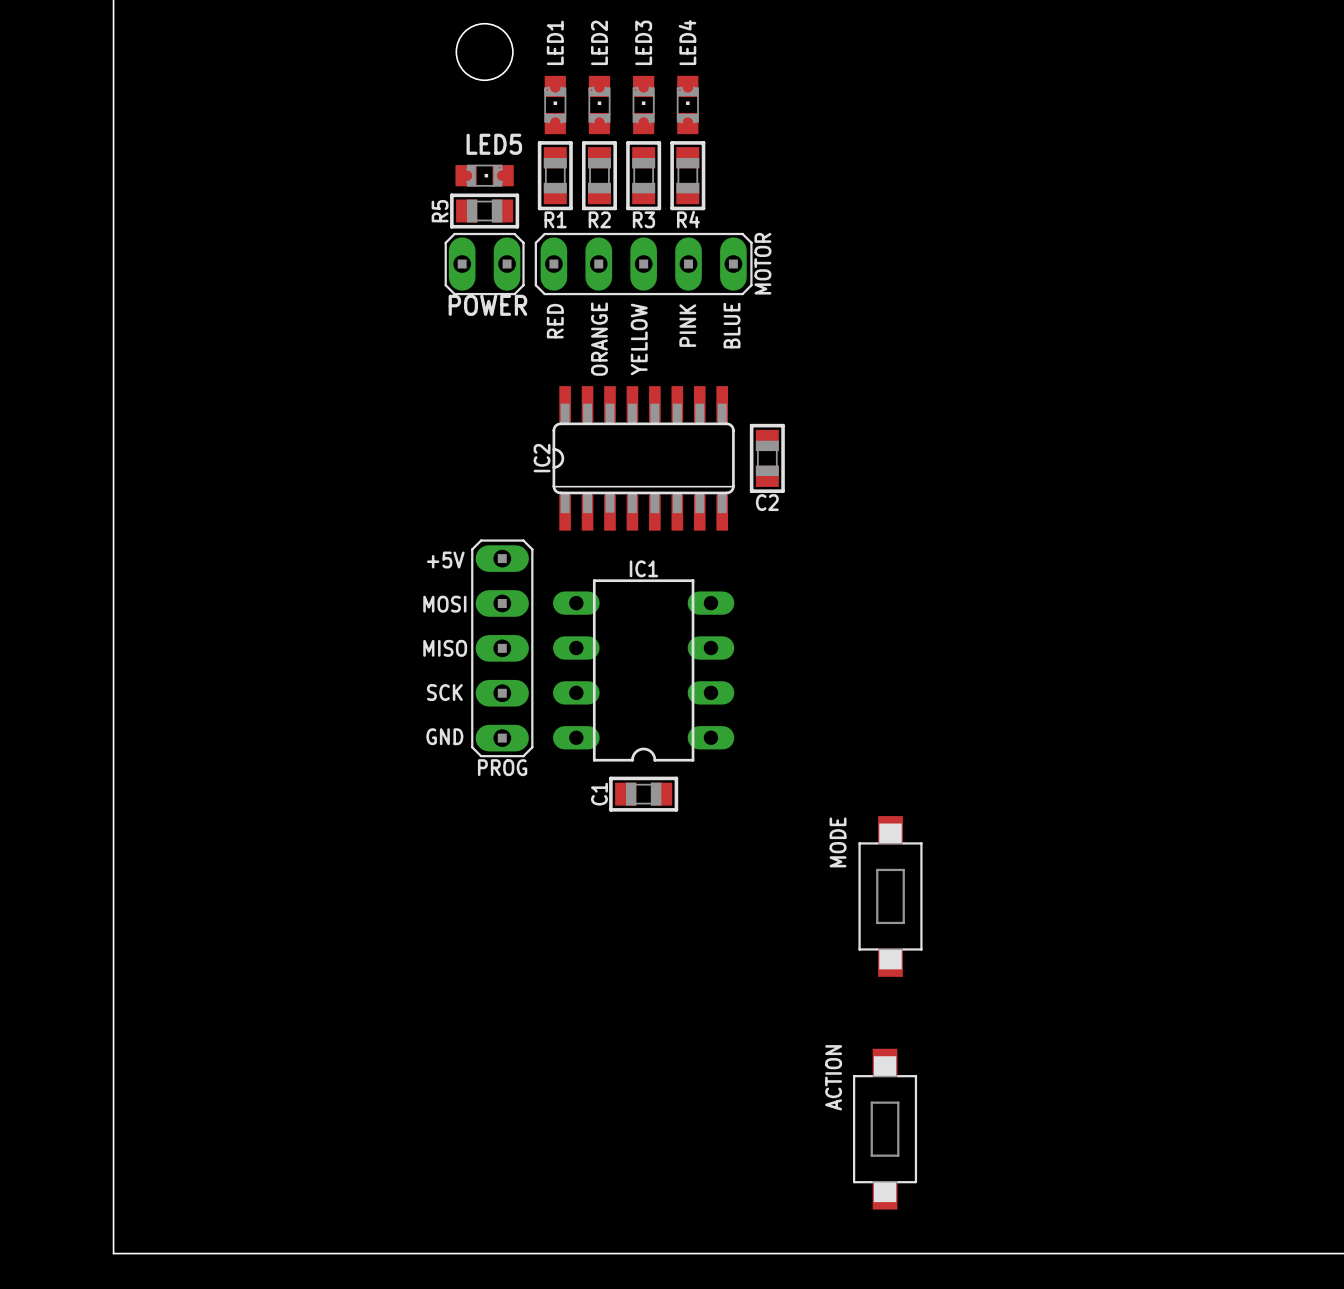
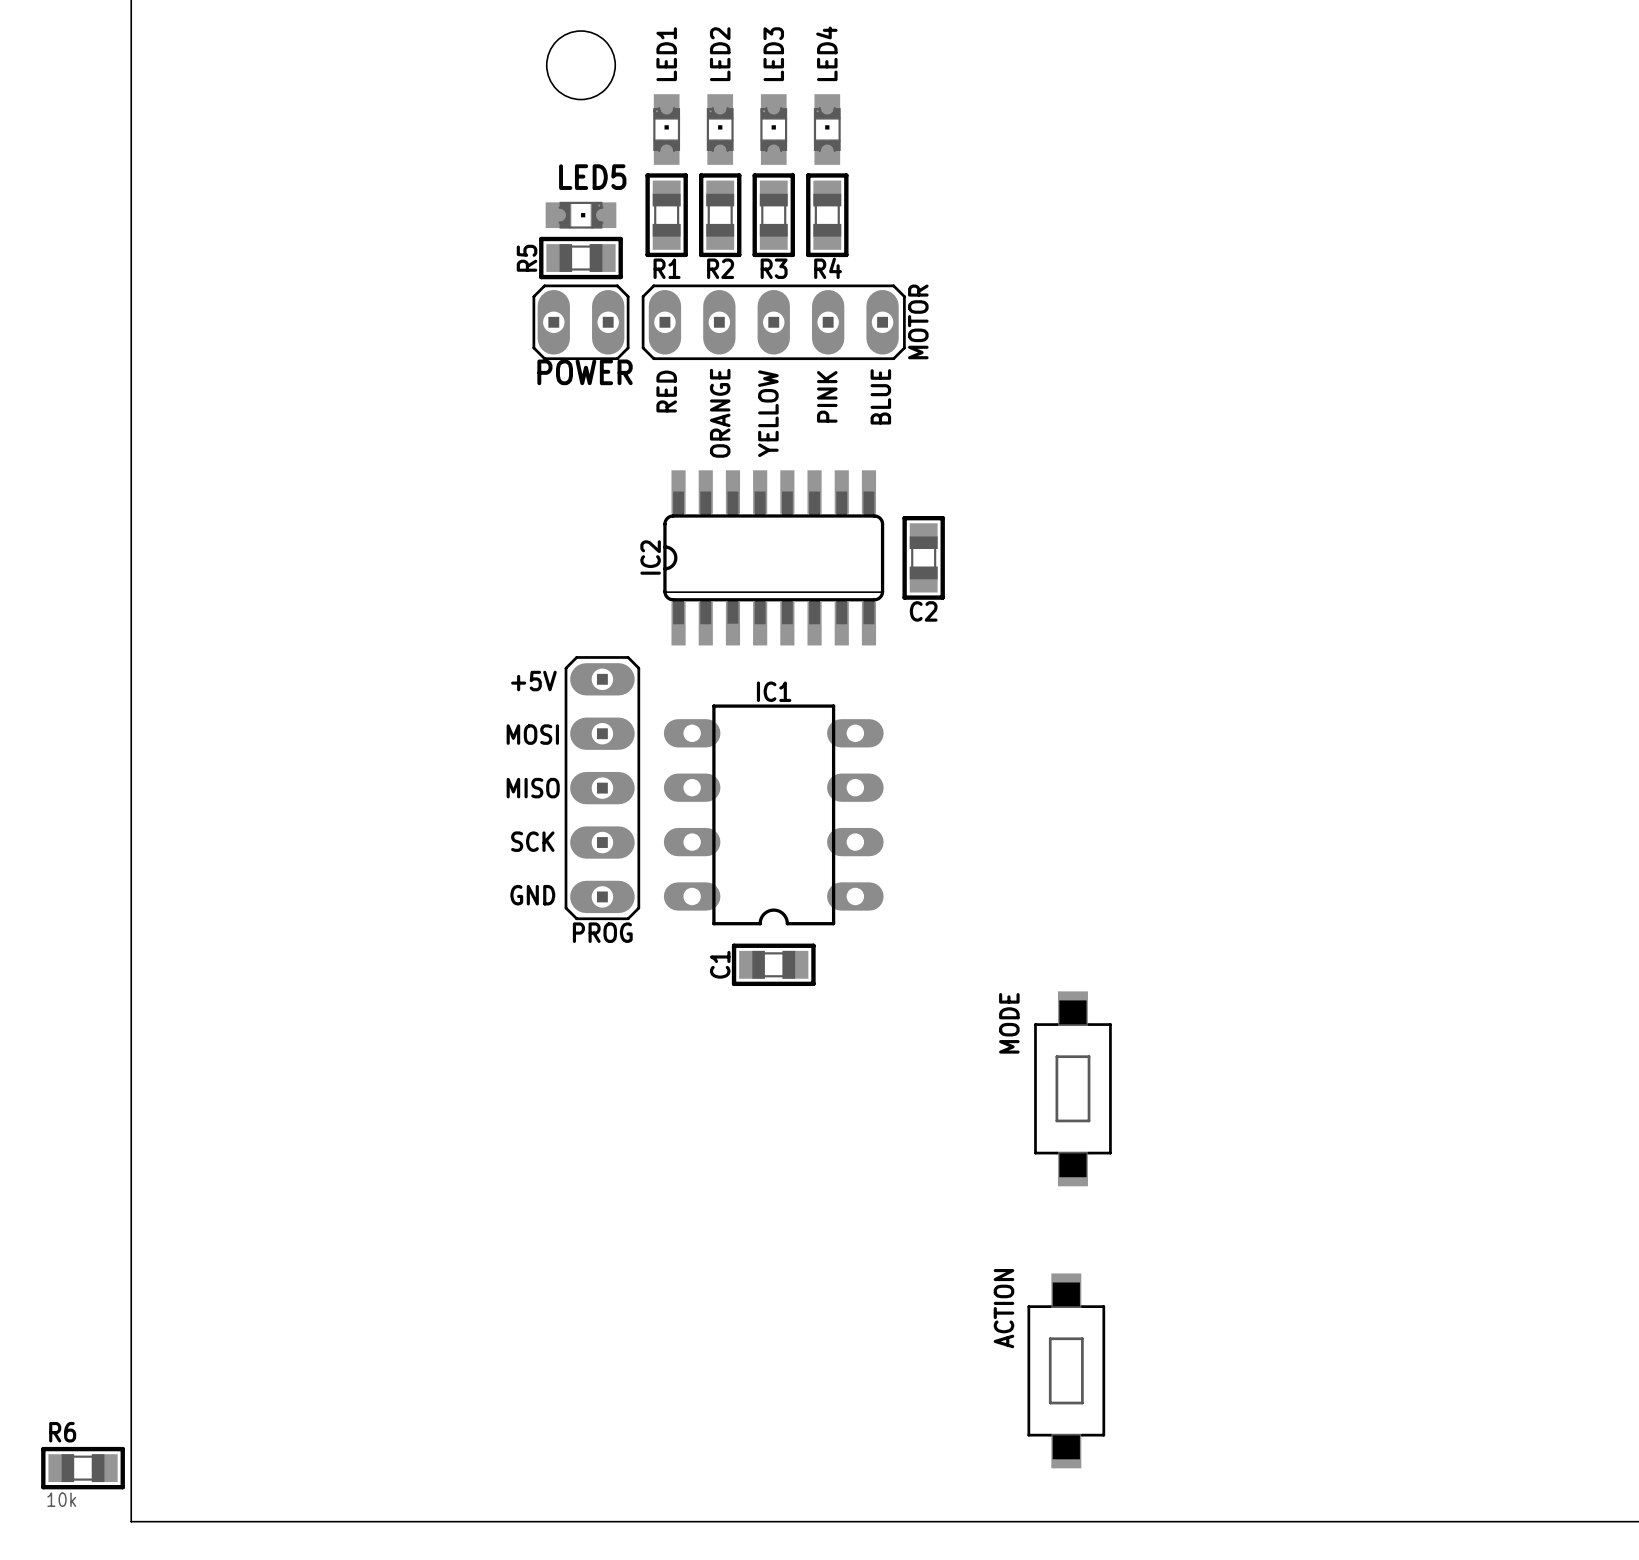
R6: none -> 10k (83, 1468)

